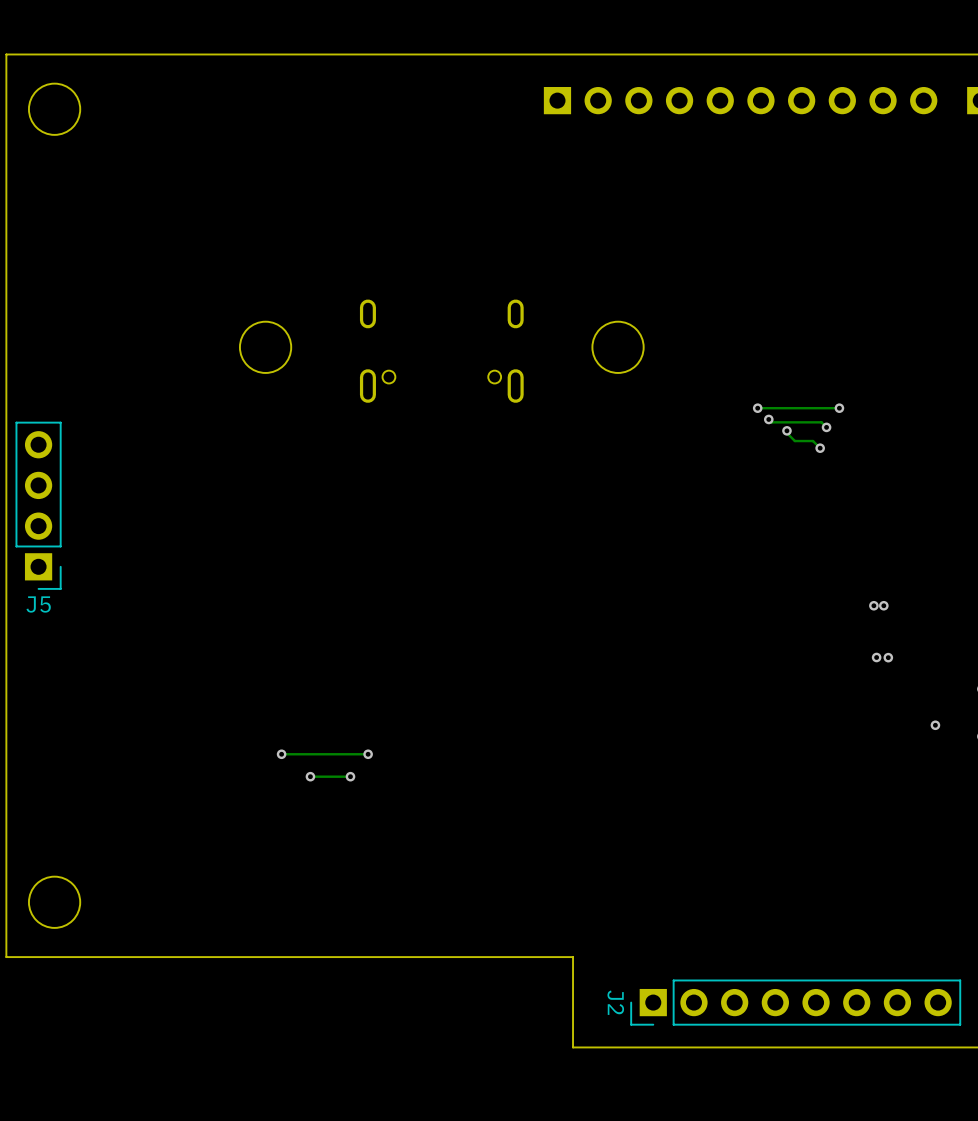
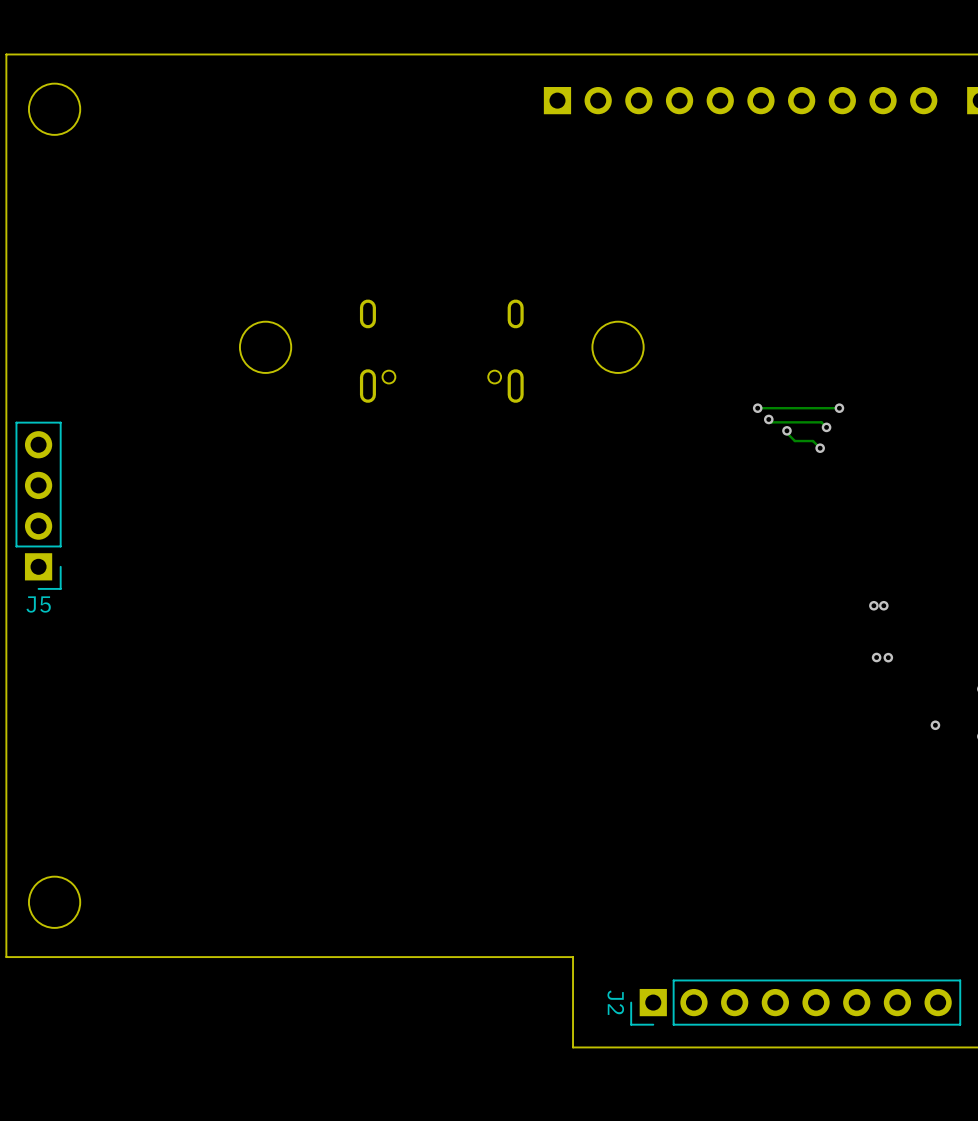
via: (281, 754) -> none
track: (368, 754) (281, 754) -> none
via: (368, 754) -> none
via: (310, 776) -> none
track: (350, 776) (310, 776) -> none
via: (350, 776) -> none

